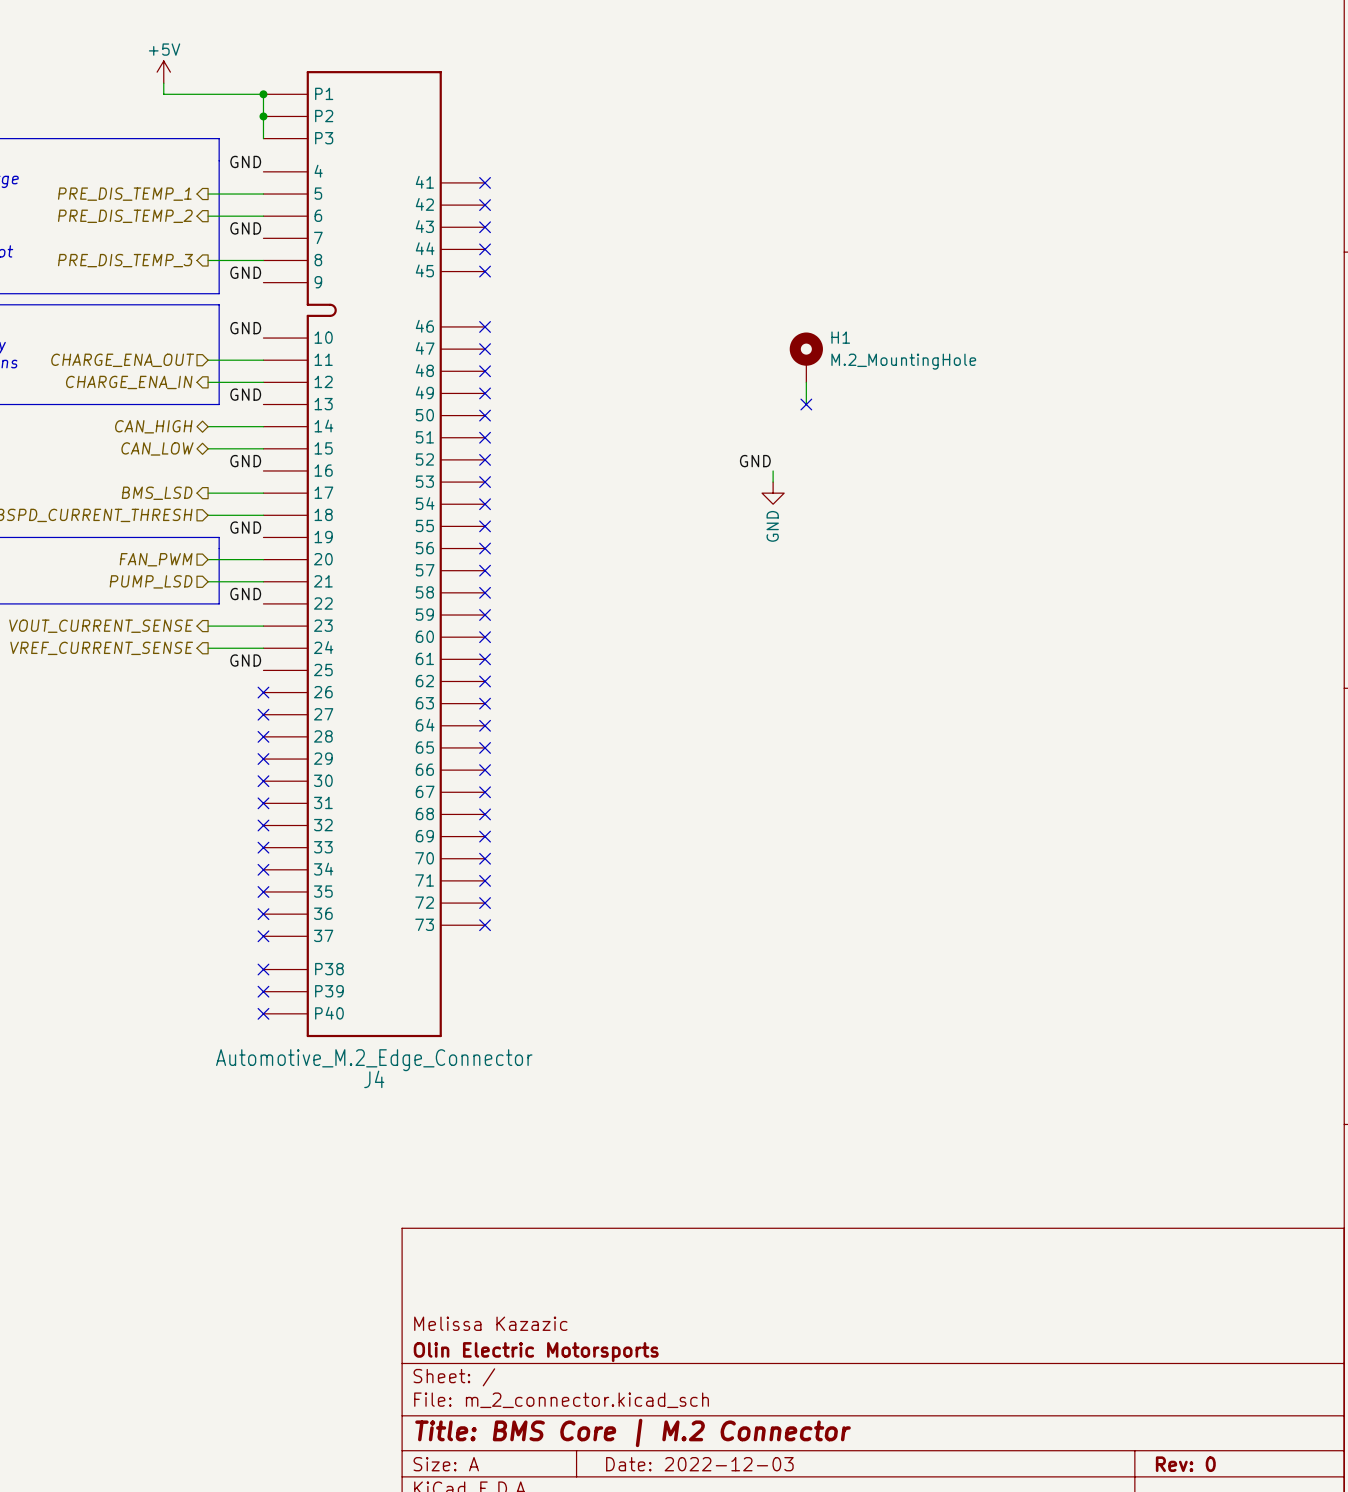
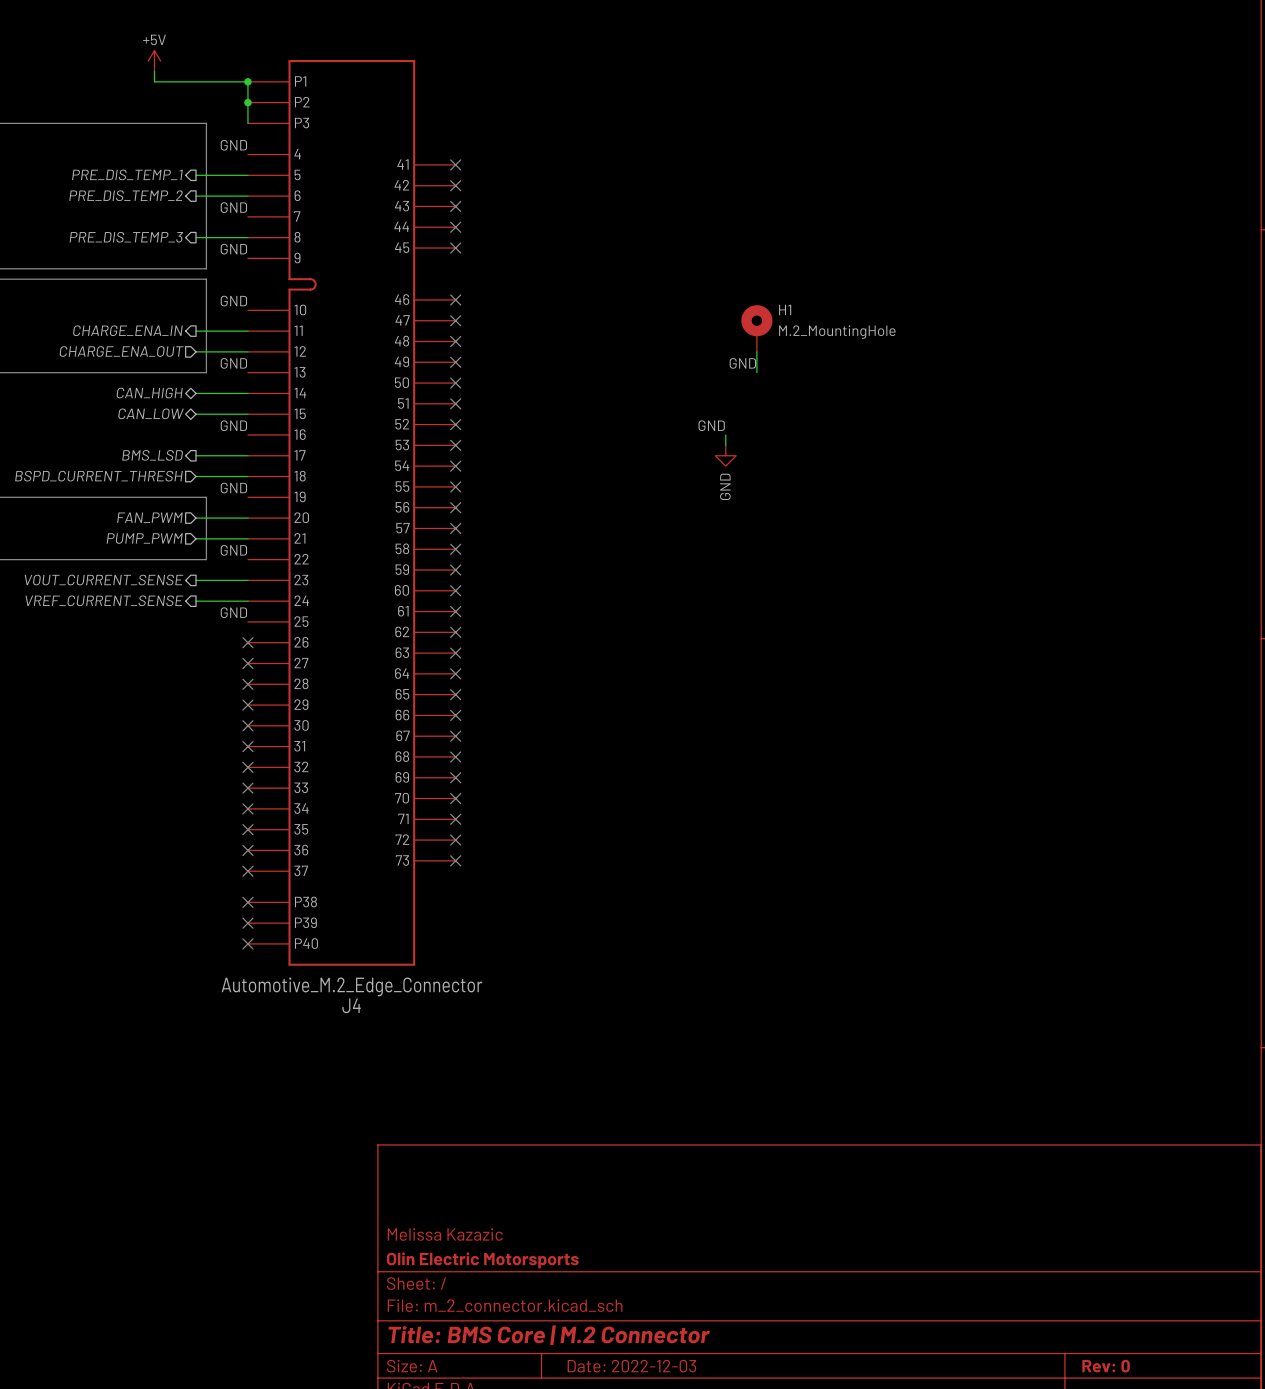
hierarchical label shape: input (122, 360) -> output (127, 330)
hierarchical label: CHARGE_ENA_OUT (122, 360) -> CHARGE_ENA_IN (127, 330)
hierarchical label shape: output (129, 382) -> input (121, 351)
hierarchical label: CHARGE_ENA_IN (129, 382) -> CHARGE_ENA_OUT (121, 351)
label: none -> GND (742, 363)
no-connect mark: (806, 404) -> none
hierarchical label: PUMP_LSD (151, 581) -> PUMP_PWM (144, 538)

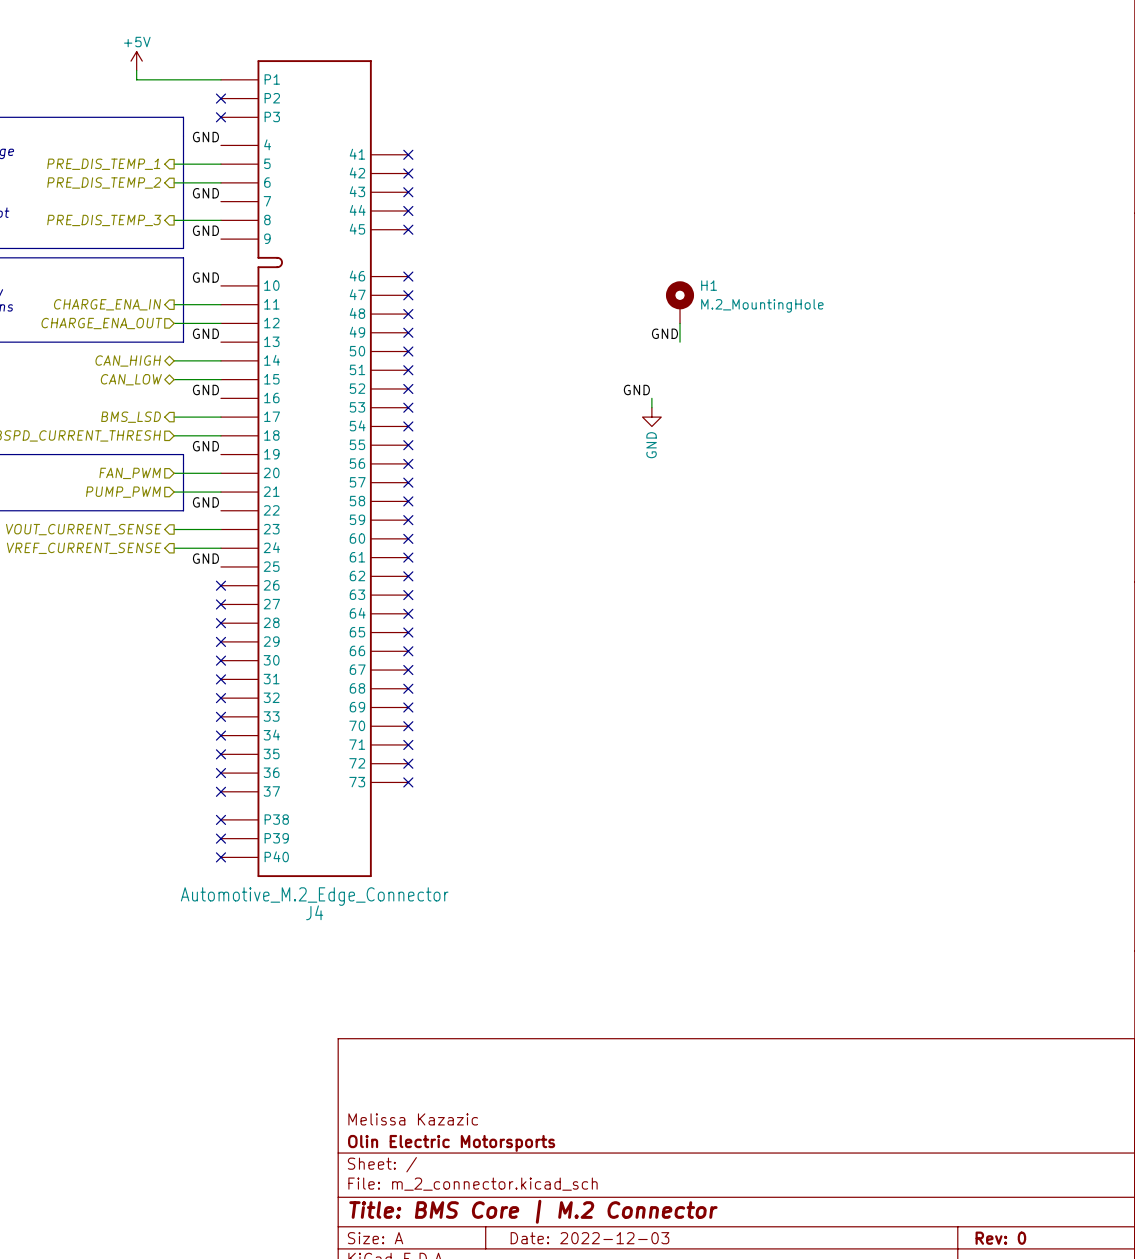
wire: (247, 81) (247, 123) -> none
junction: (247, 81) -> none
junction: (247, 102) -> none
no-connect mark: none -> (220, 98)
no-connect mark: none -> (220, 117)

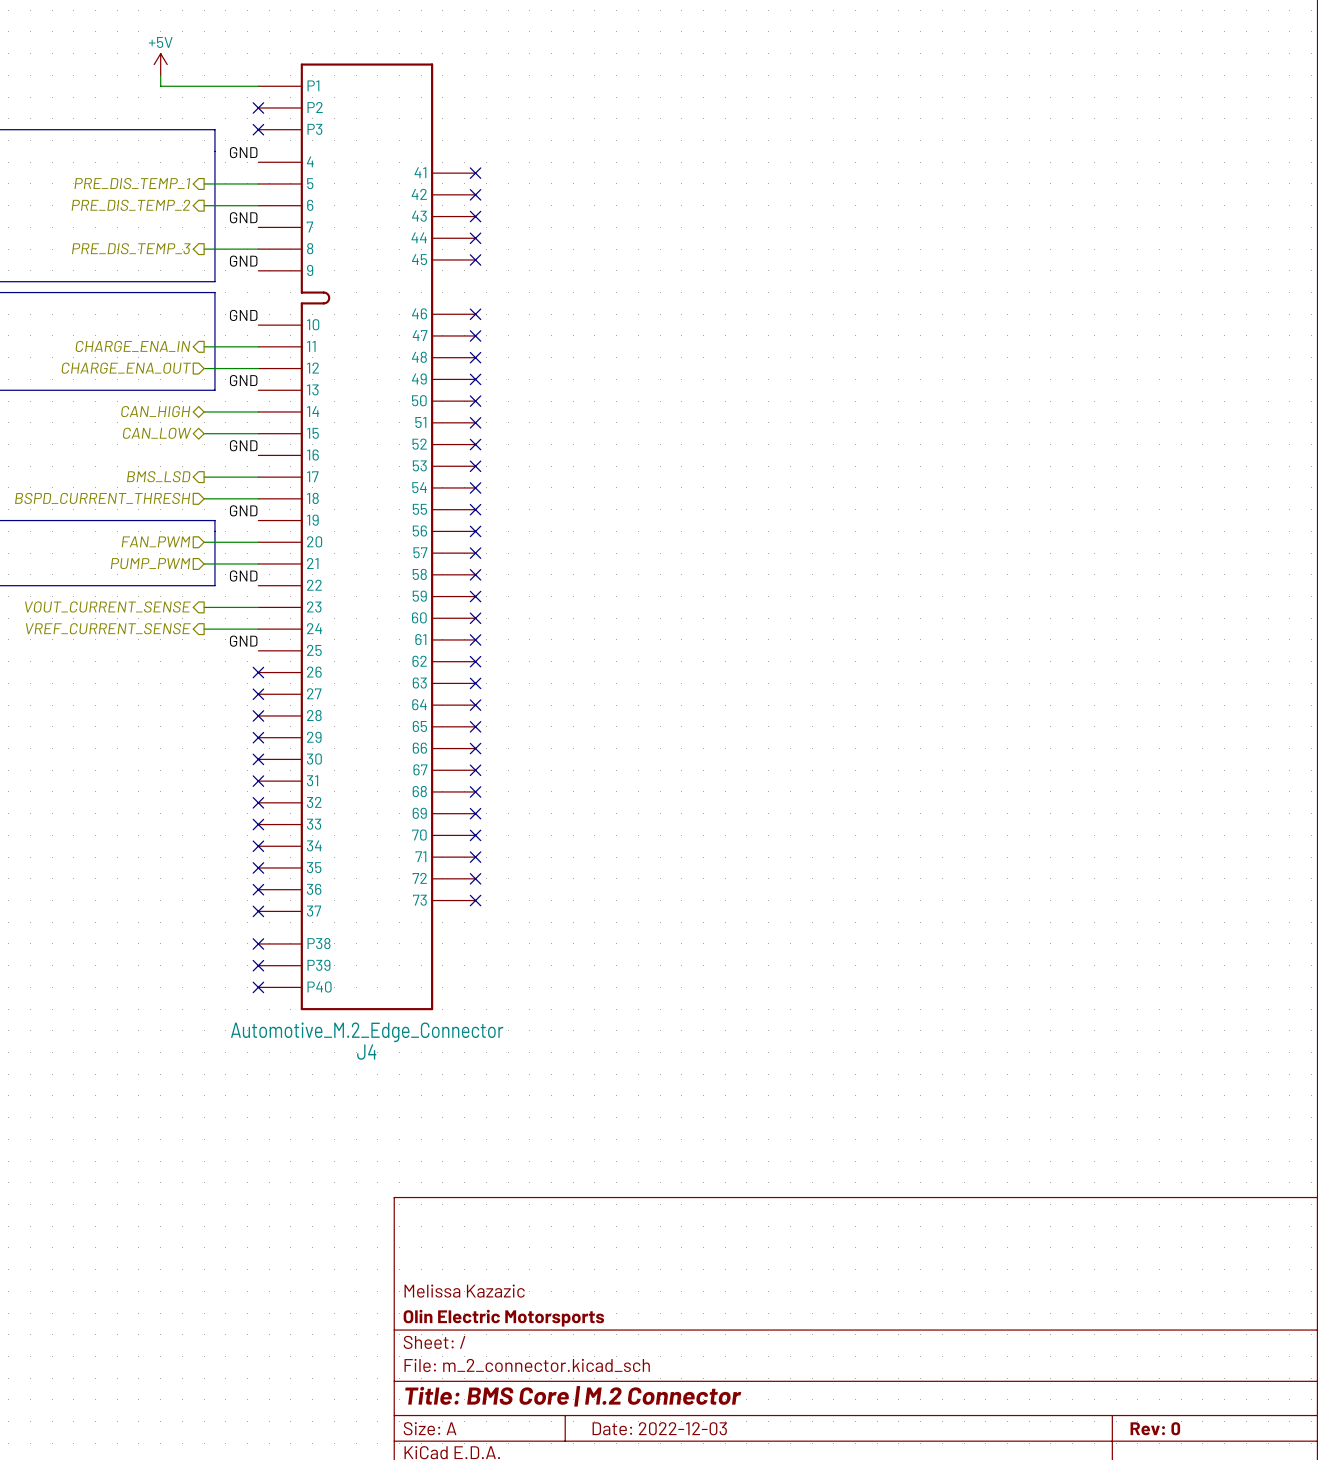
H1: M.2_MountingHole (680, 302) -> none
wire: (680, 323) (680, 342) -> none
label: GND (664, 333) -> none
label: GND (636, 389) -> none
wire: (651, 398) (651, 407) -> none
power symbol: GND (651, 417) -> none

